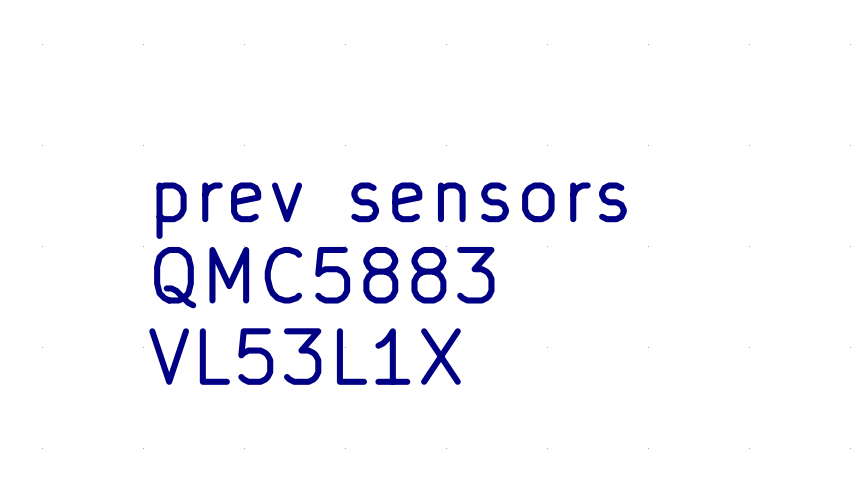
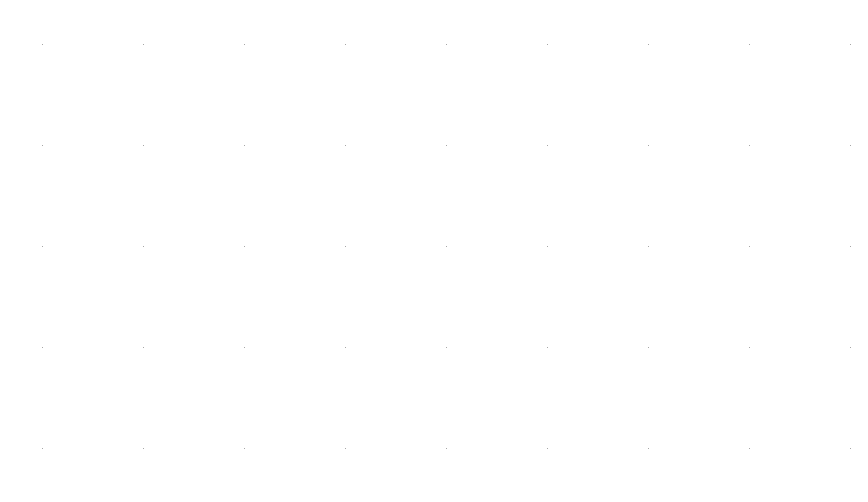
text: prev sensors (391, 210) -> none
text: QMC5883 (324, 277) -> none
text: VL53L1X (305, 356) -> none

